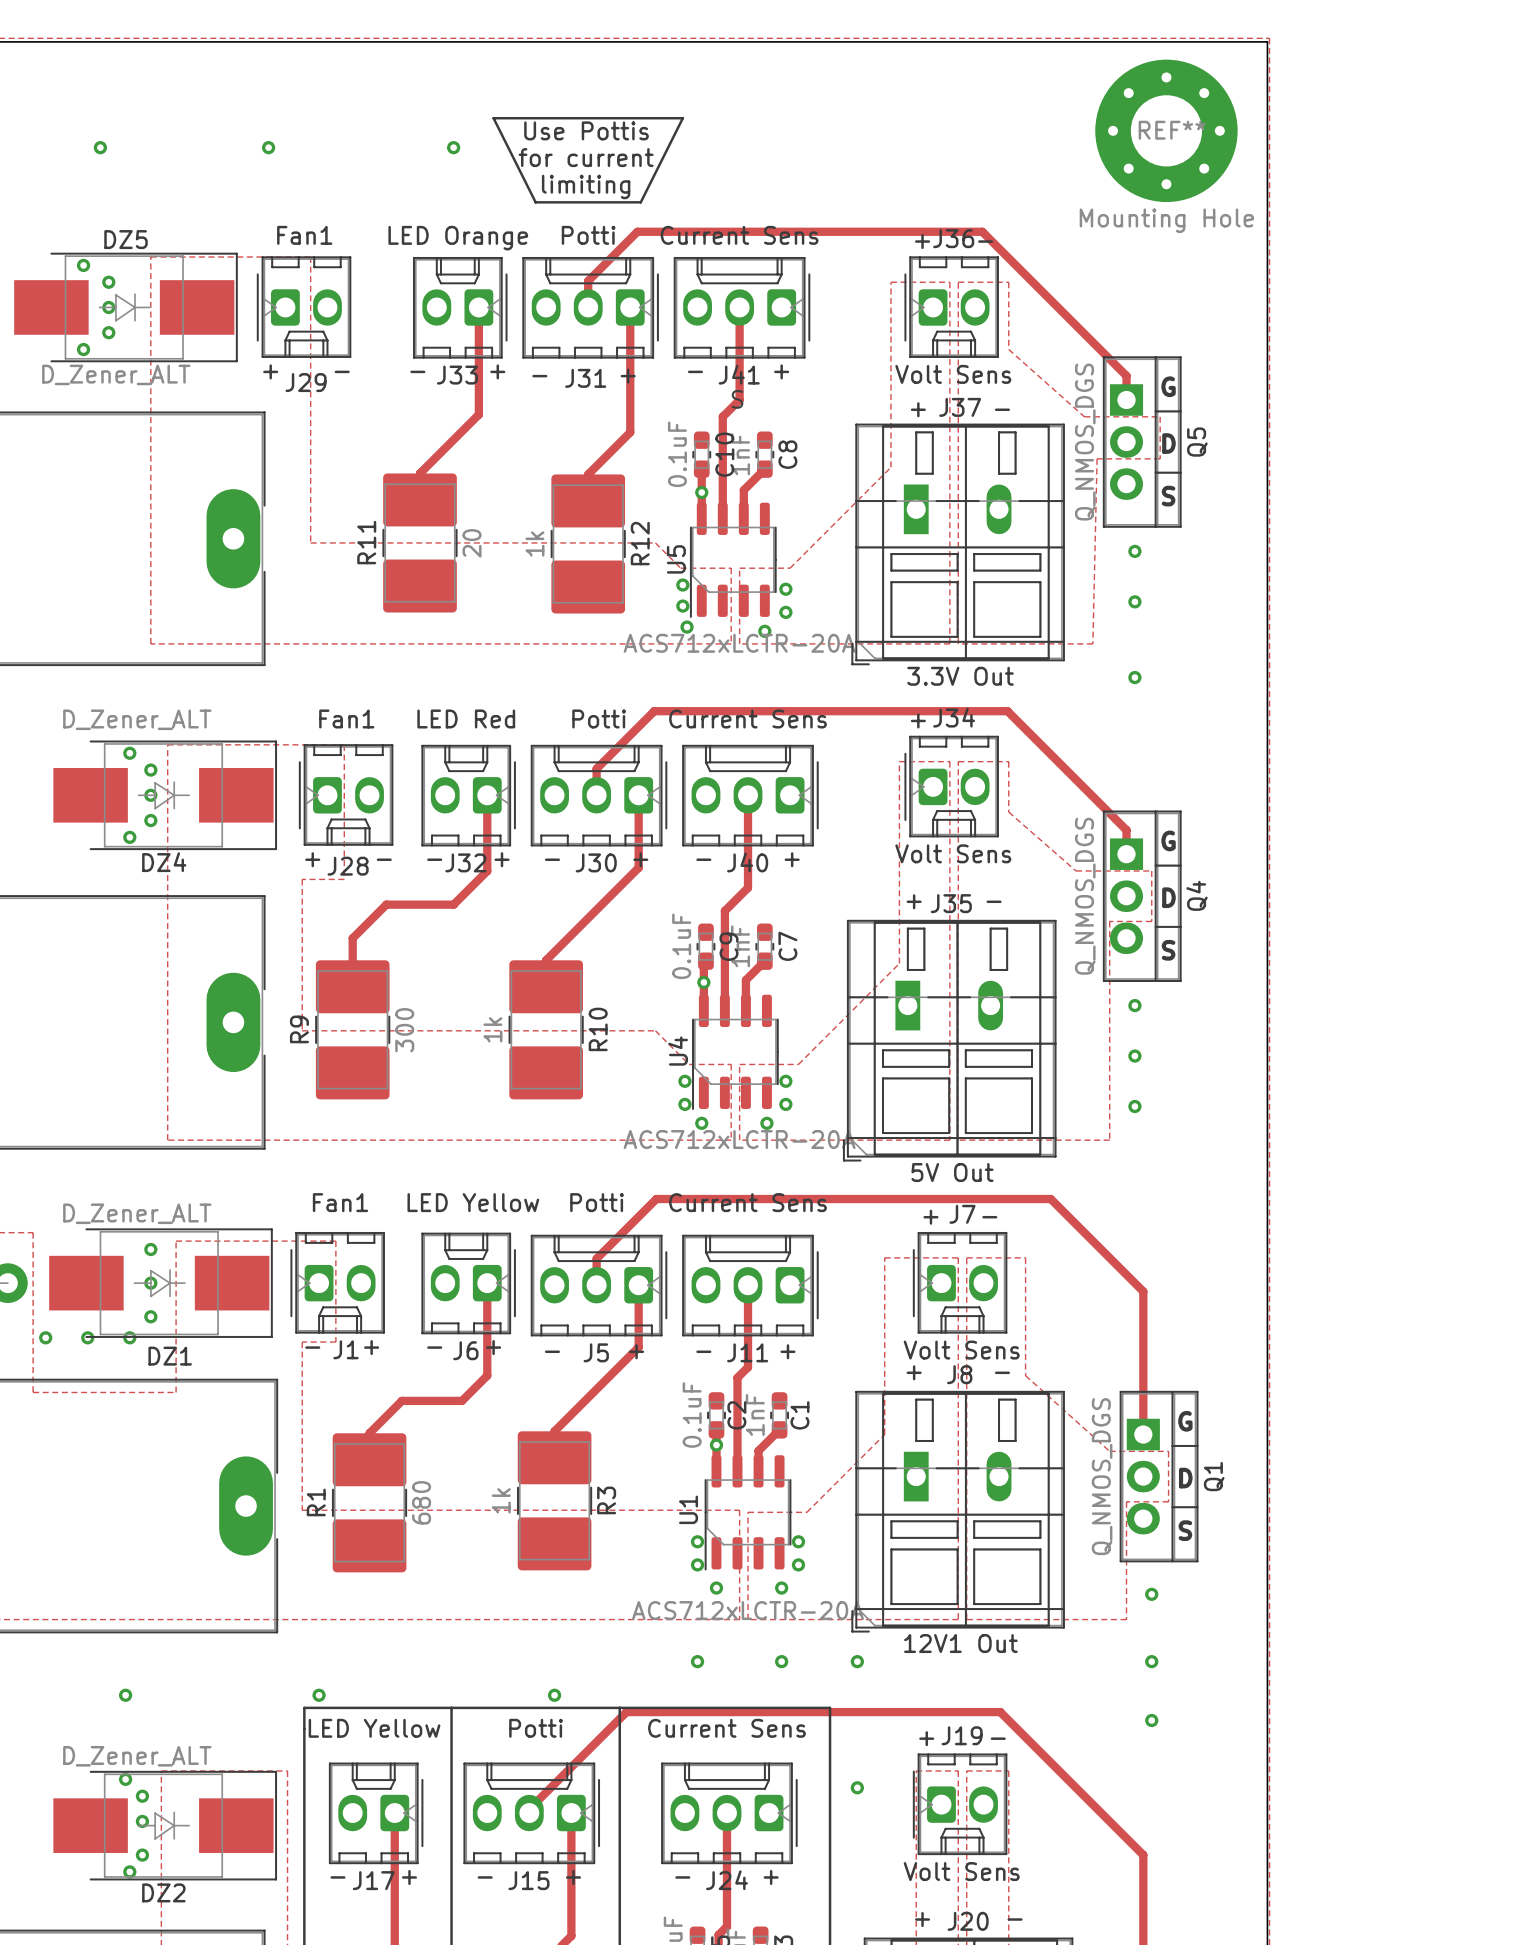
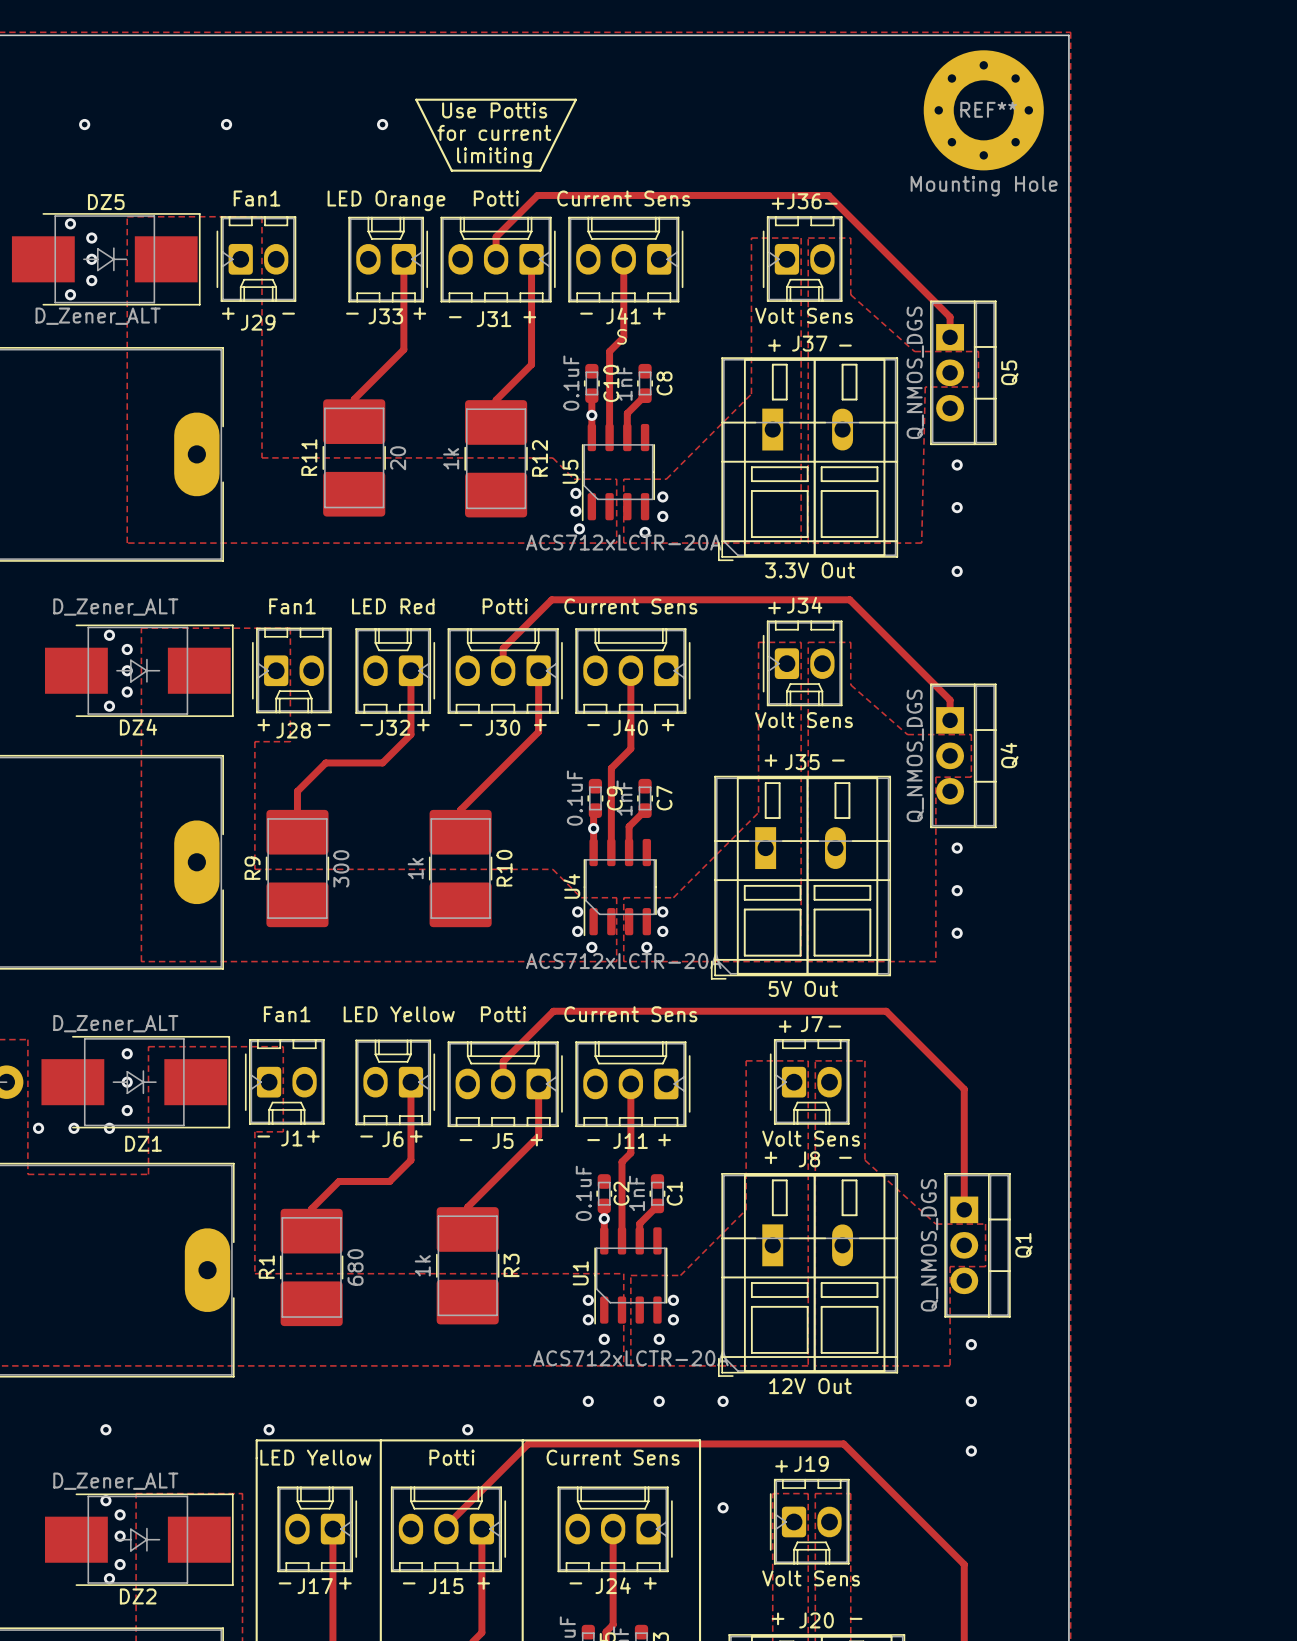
text: G (1168, 386) -> none
text: D (1168, 443) -> none
text: S (1168, 496) -> none
text: G (1168, 840) -> none
text: D (1168, 897) -> none
text: S (1168, 950) -> none
text: G (1185, 1421) -> none
text: D (1185, 1478) -> none
text: S (1185, 1530) -> none
J8 value: 12V1 Out (960, 1643) -> 12V Out (810, 1386)
text: - (998, 1738) -> none

